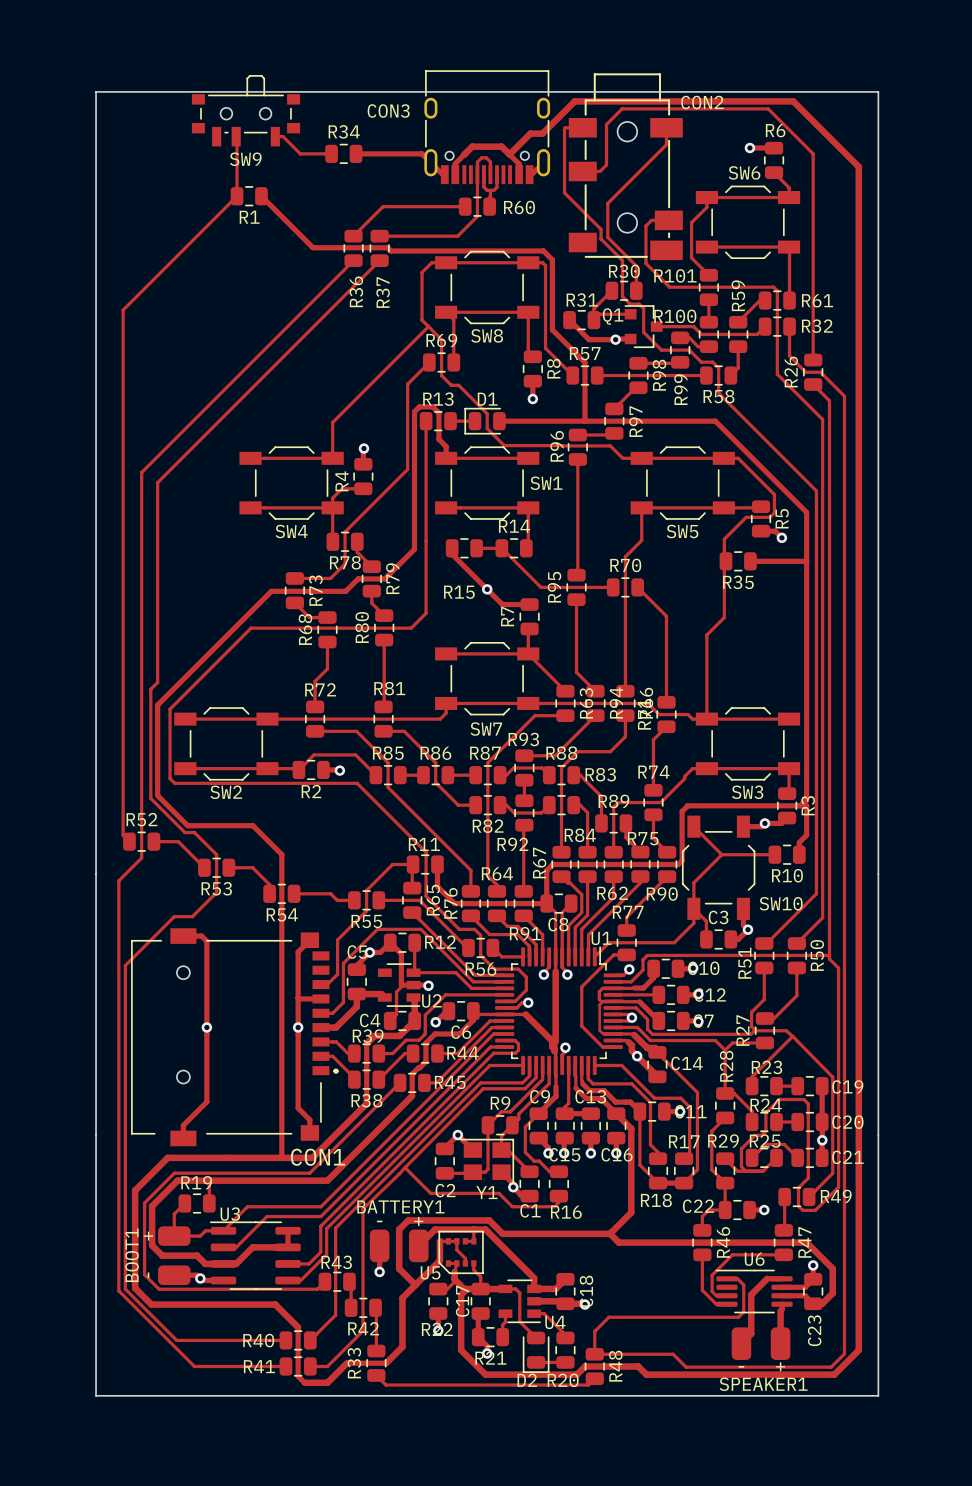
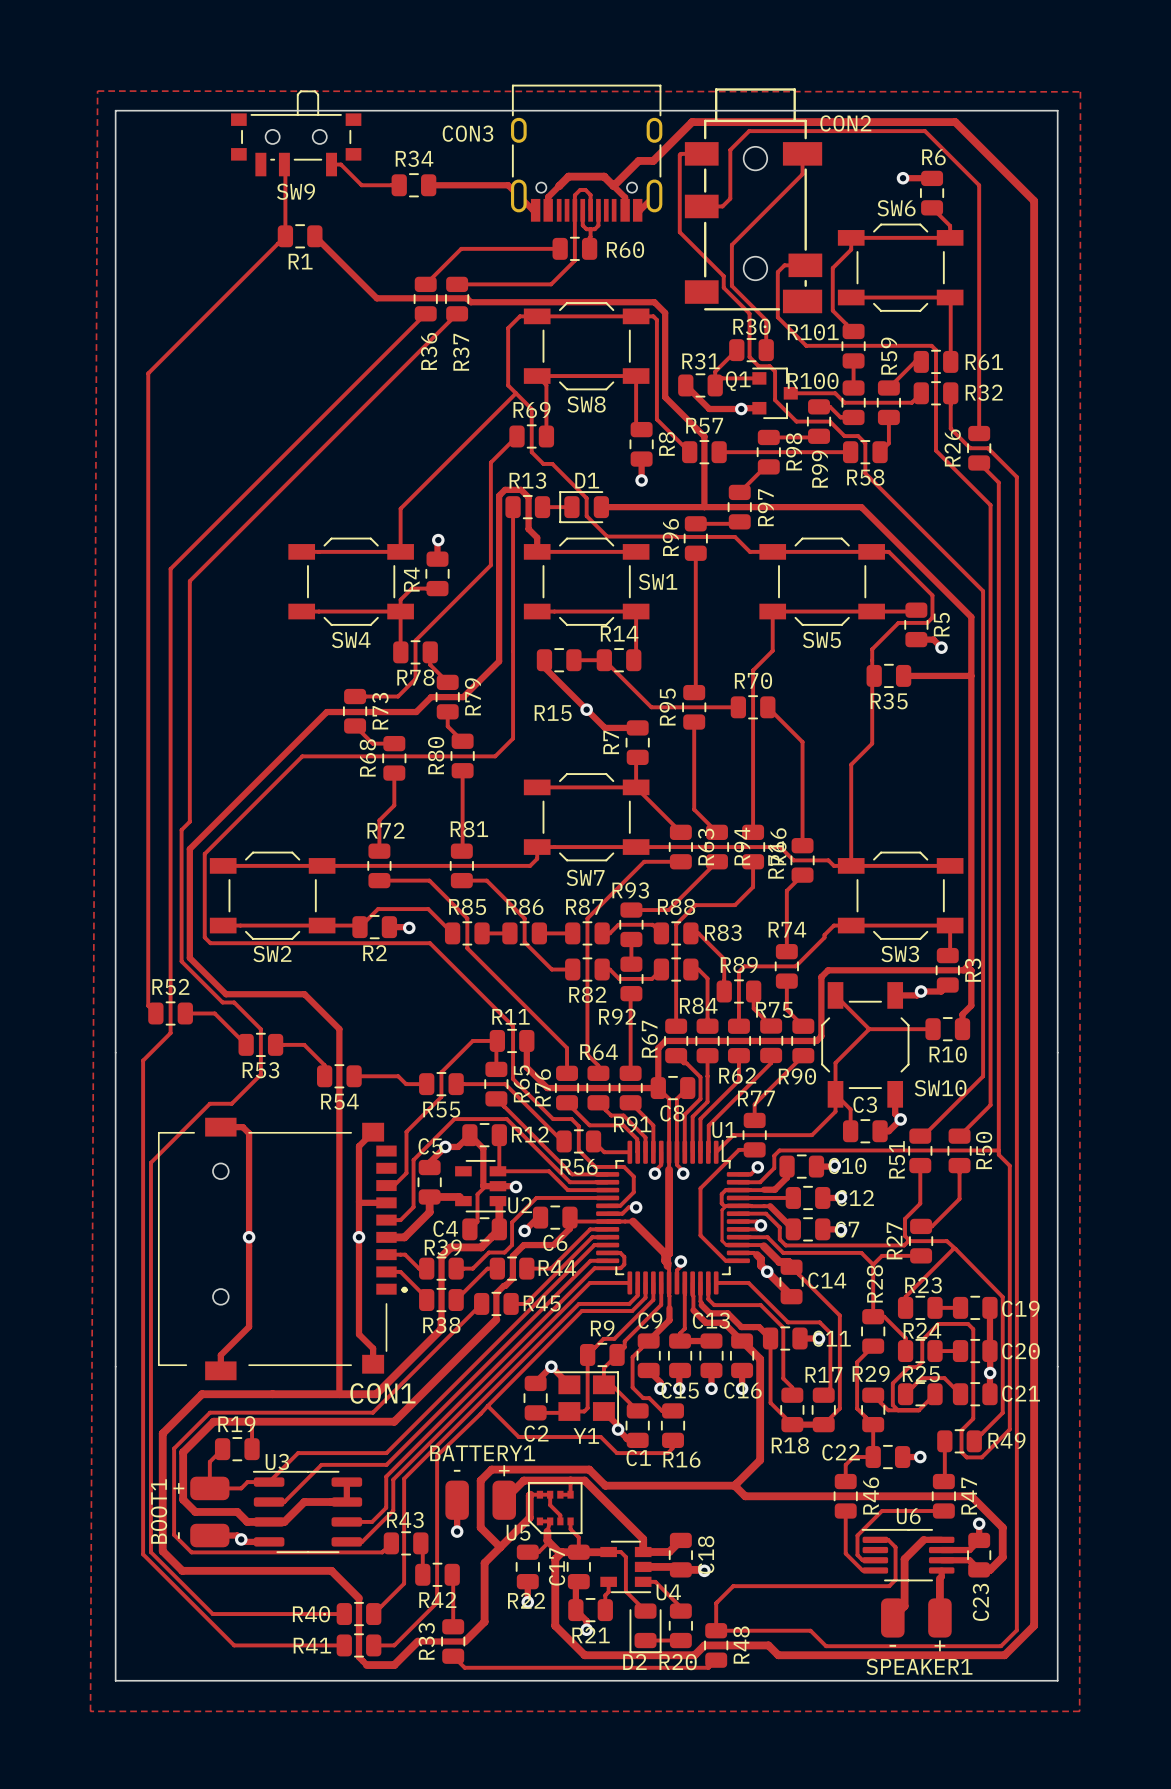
zone outline: none -> (97, 91) (90, 1711) (1079, 1711) (1080, 91) (97, 91)

